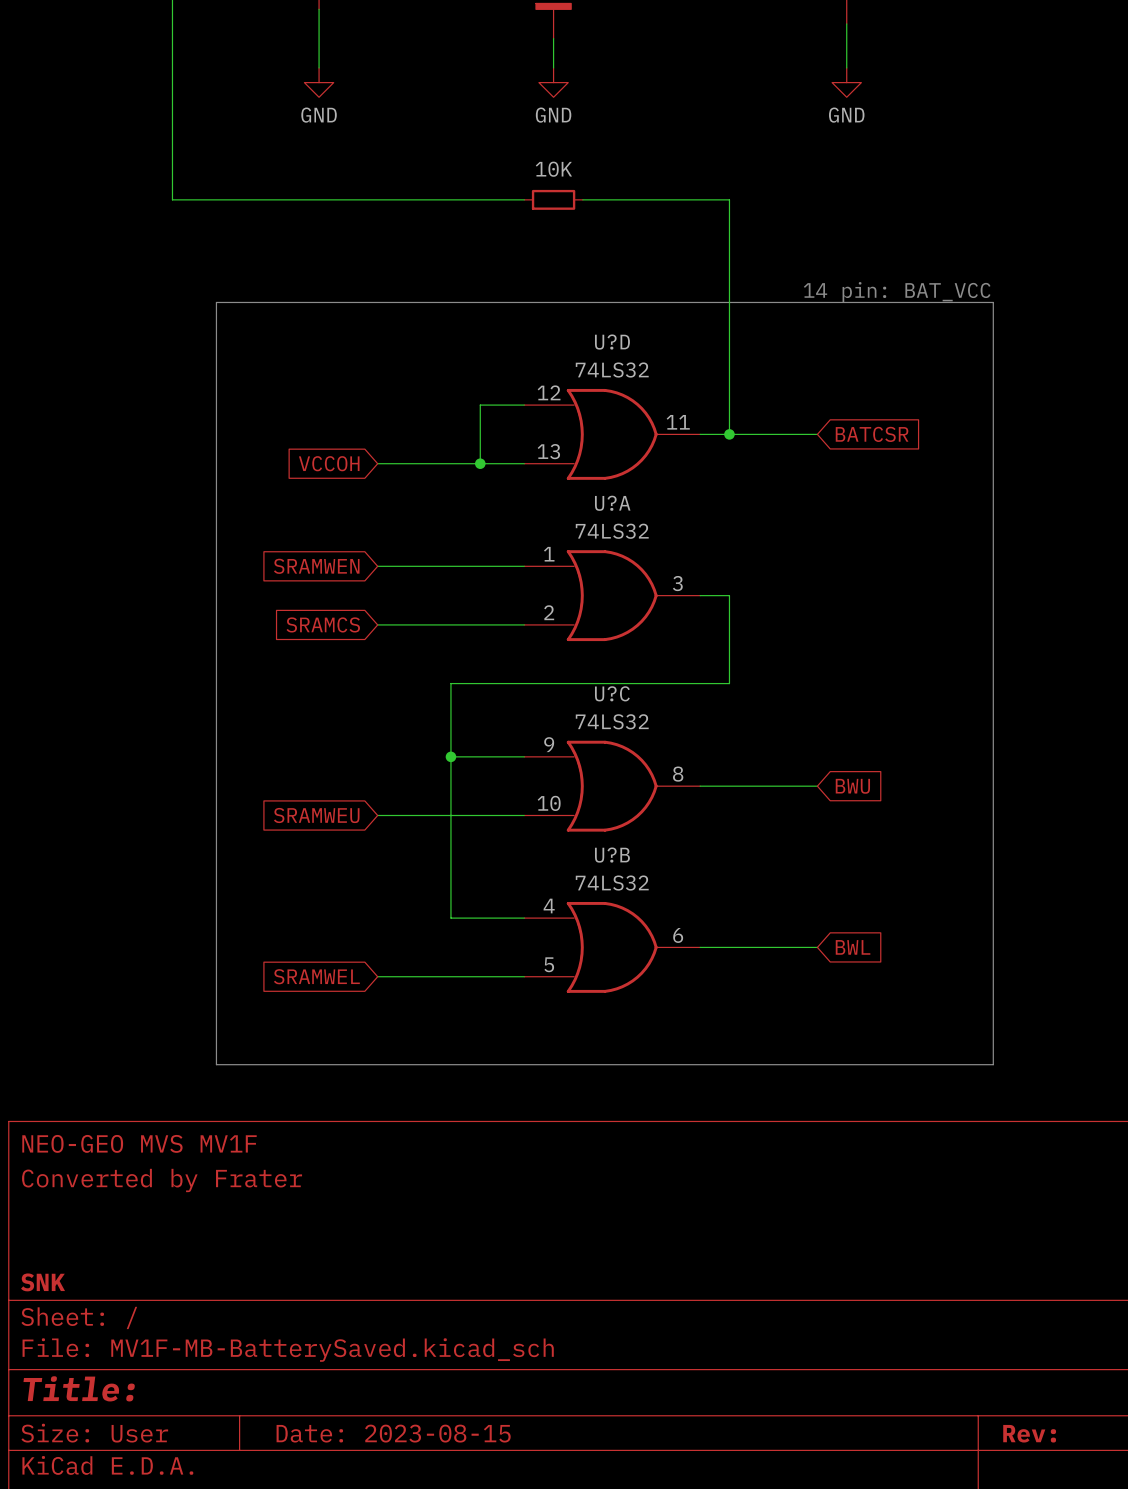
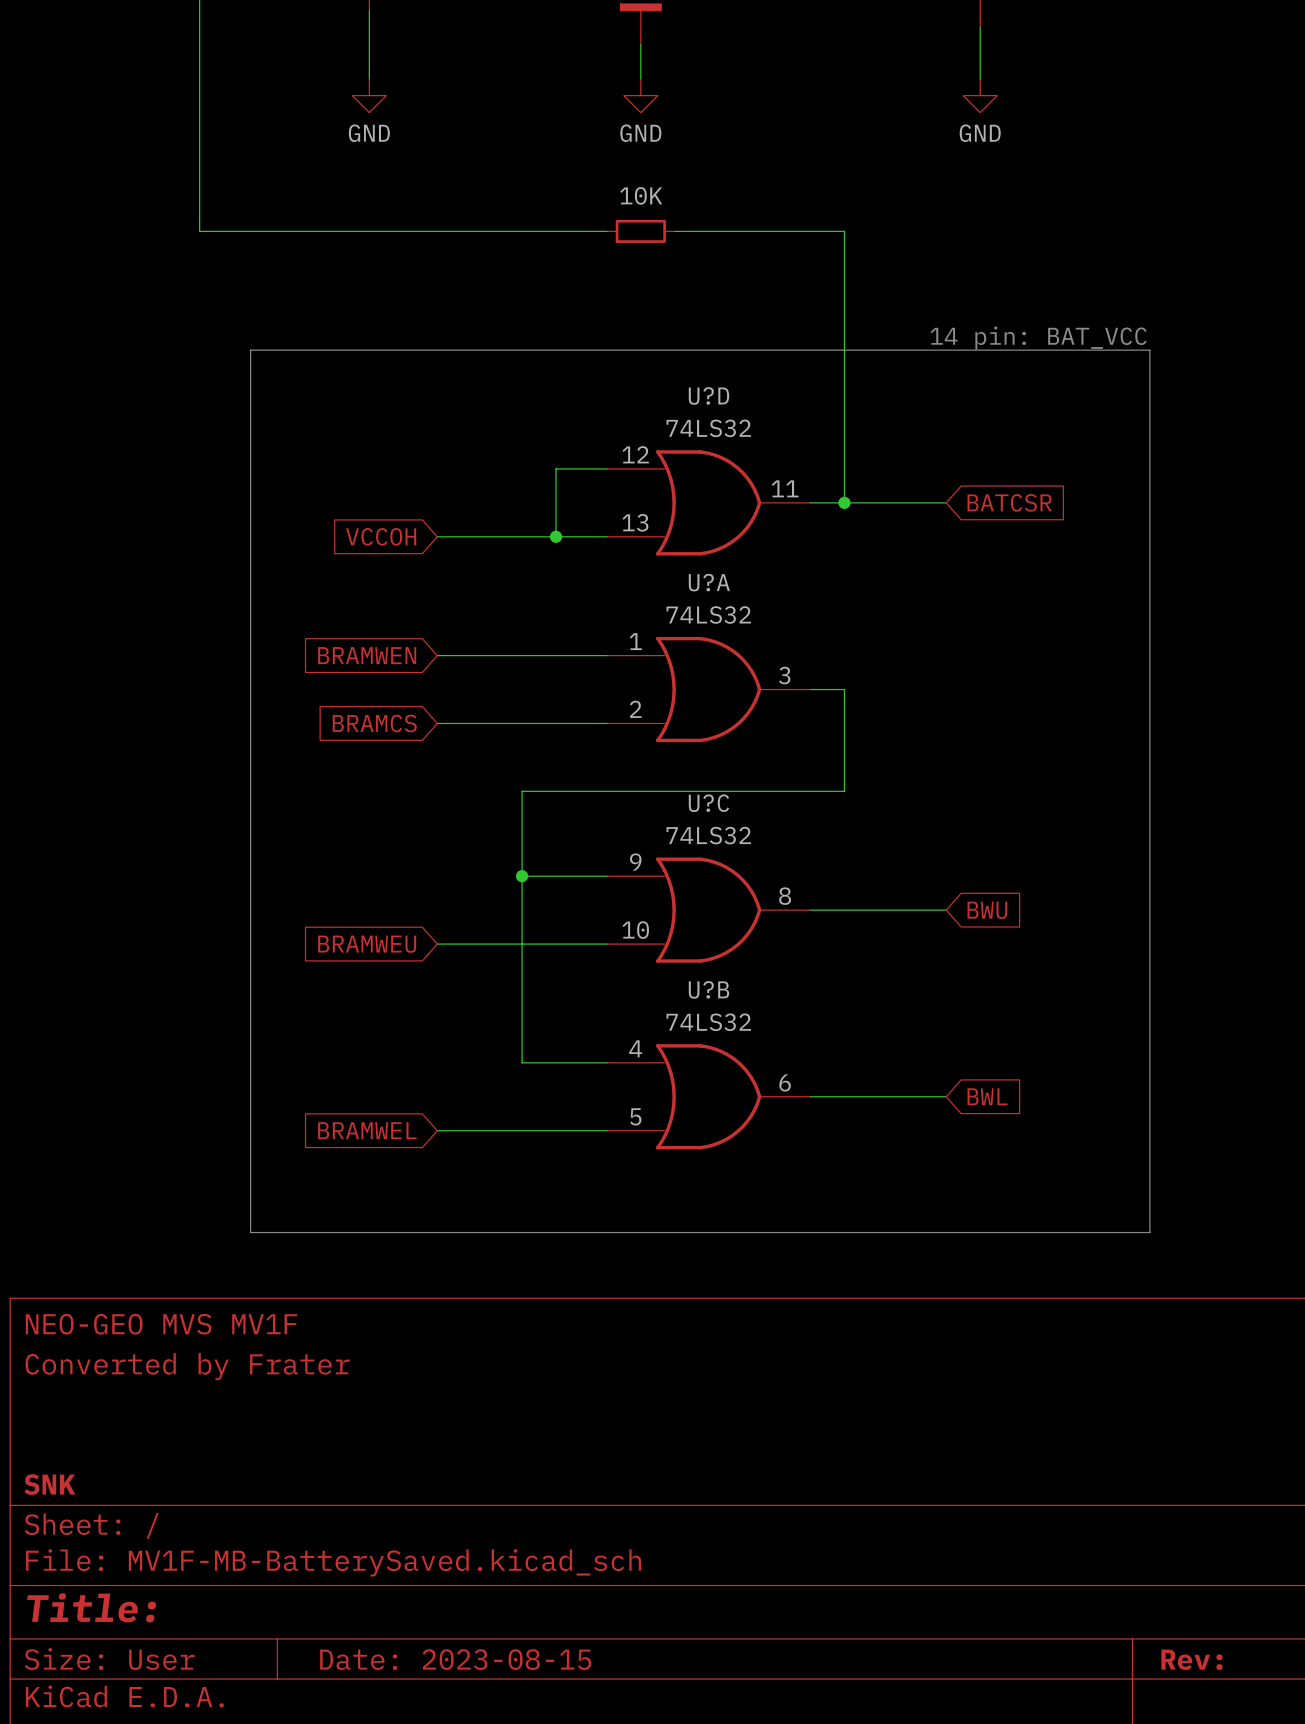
global label: SRAMWEN (316, 566) -> BRAMWEN (367, 655)
global label: SRAMCS (323, 624) -> BRAMCS (374, 723)
global label: SRAMWEU (316, 815) -> BRAMWEU (367, 944)
global label: SRAMWEL (316, 976) -> BRAMWEL (367, 1130)

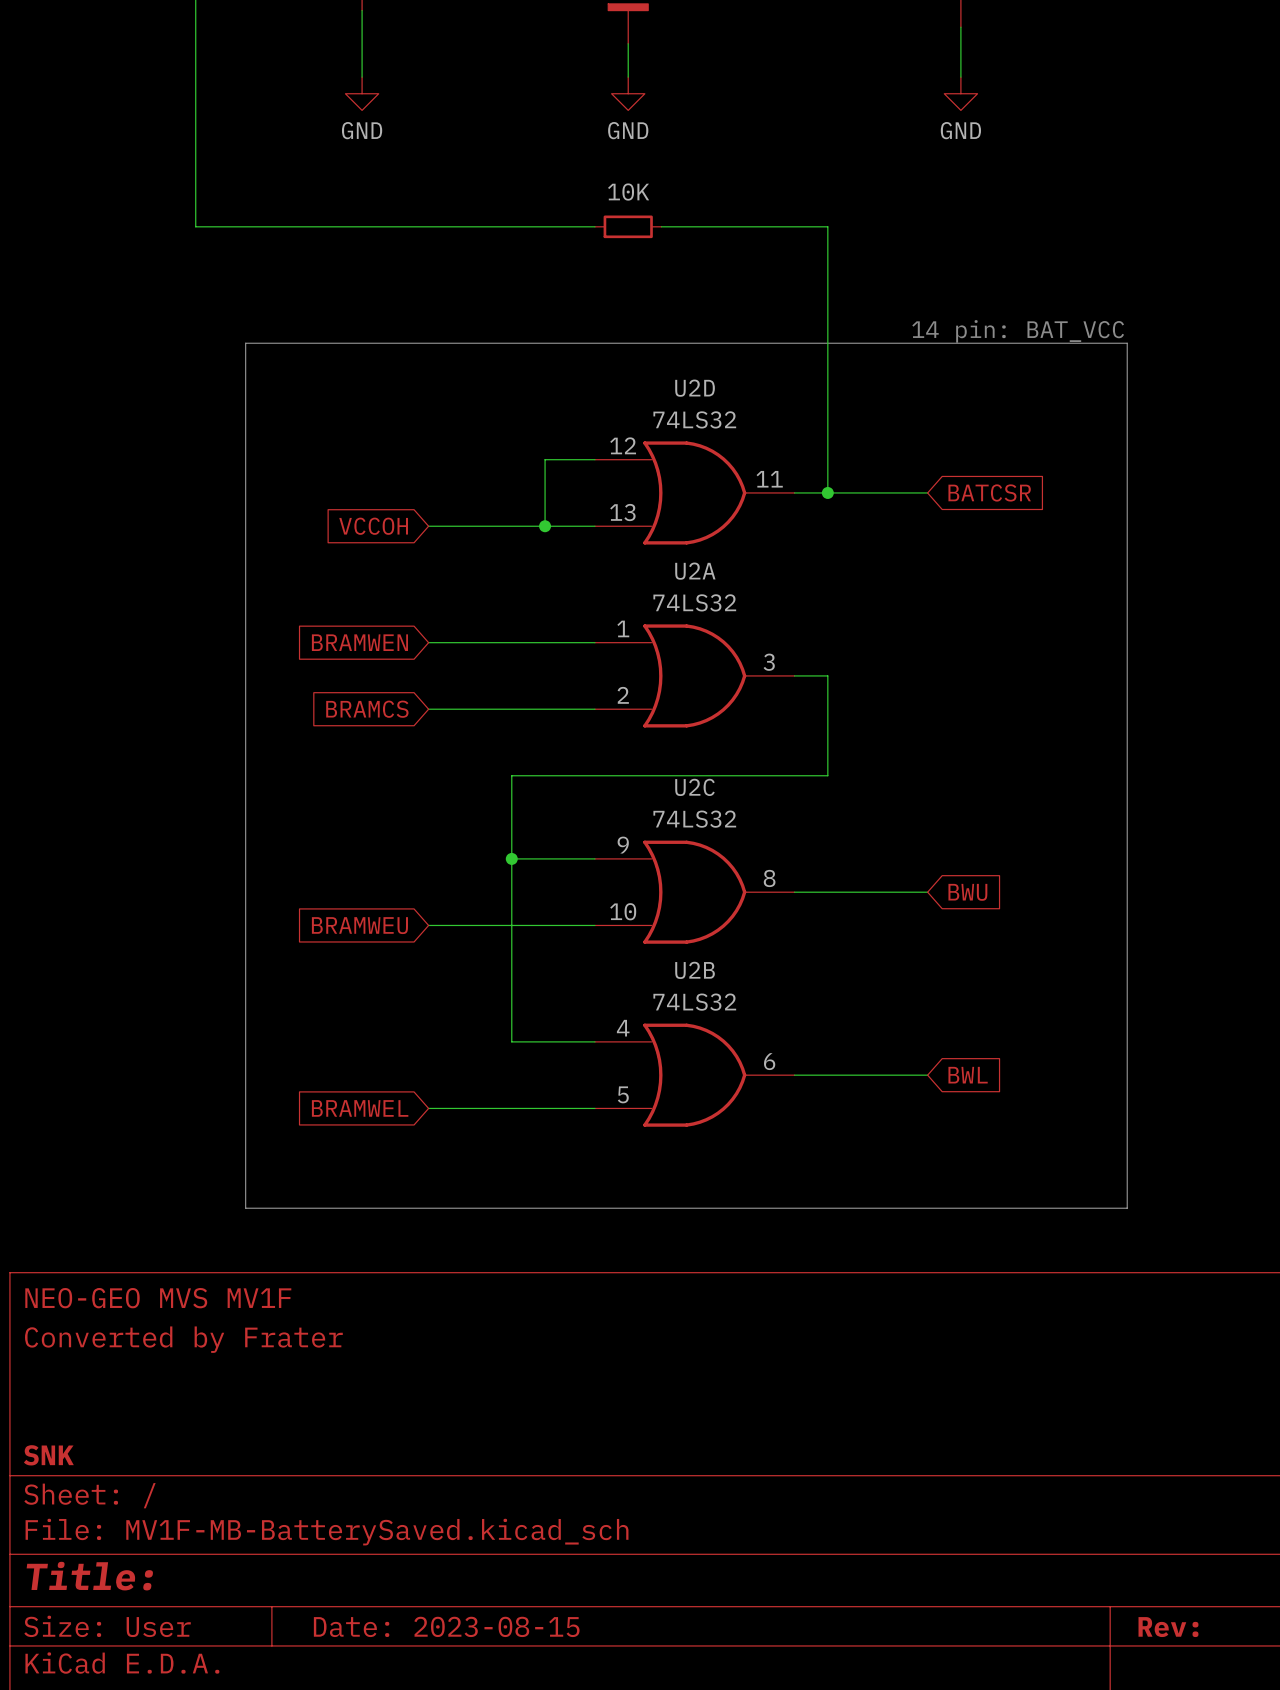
U?D name: U?D (709, 395) -> U2D (695, 388)
U?A name: U?A (709, 582) -> U2A (695, 571)
U?C name: U?C (708, 803) -> U2C (694, 787)
U?B name: U?B (709, 989) -> U2B (695, 970)

